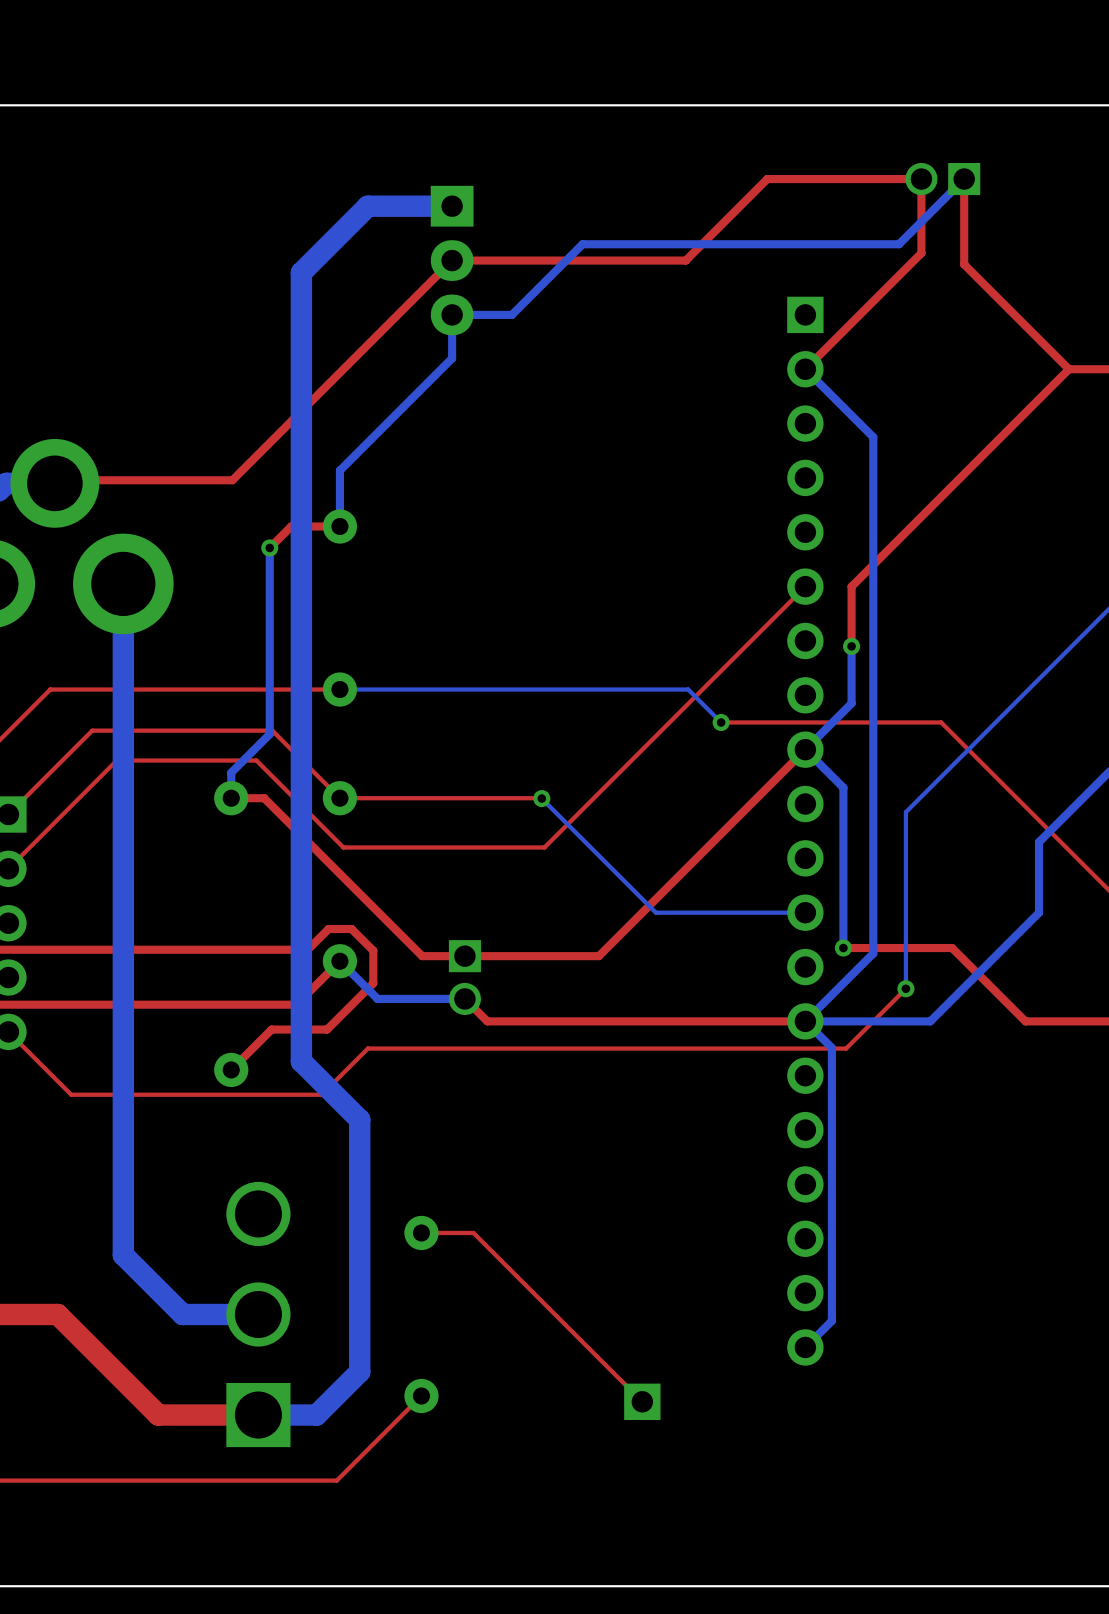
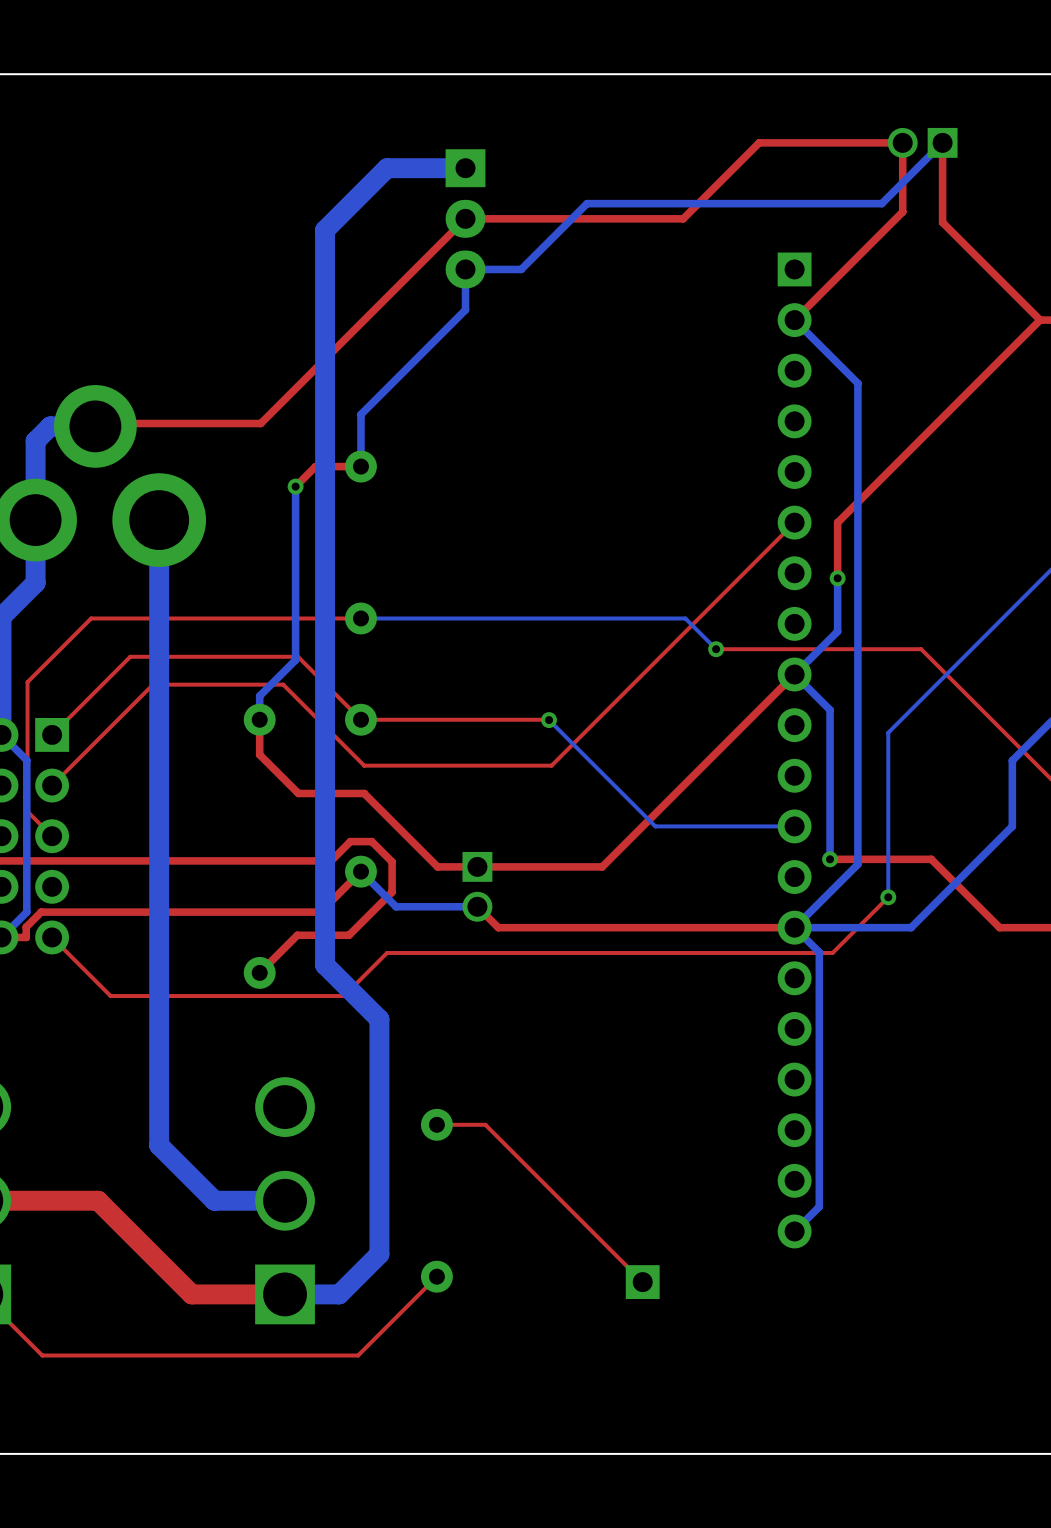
top track: (231, 798) (264, 798) (343, 877) -> (259, 719) (259, 754) (298, 793) (364, 793)

